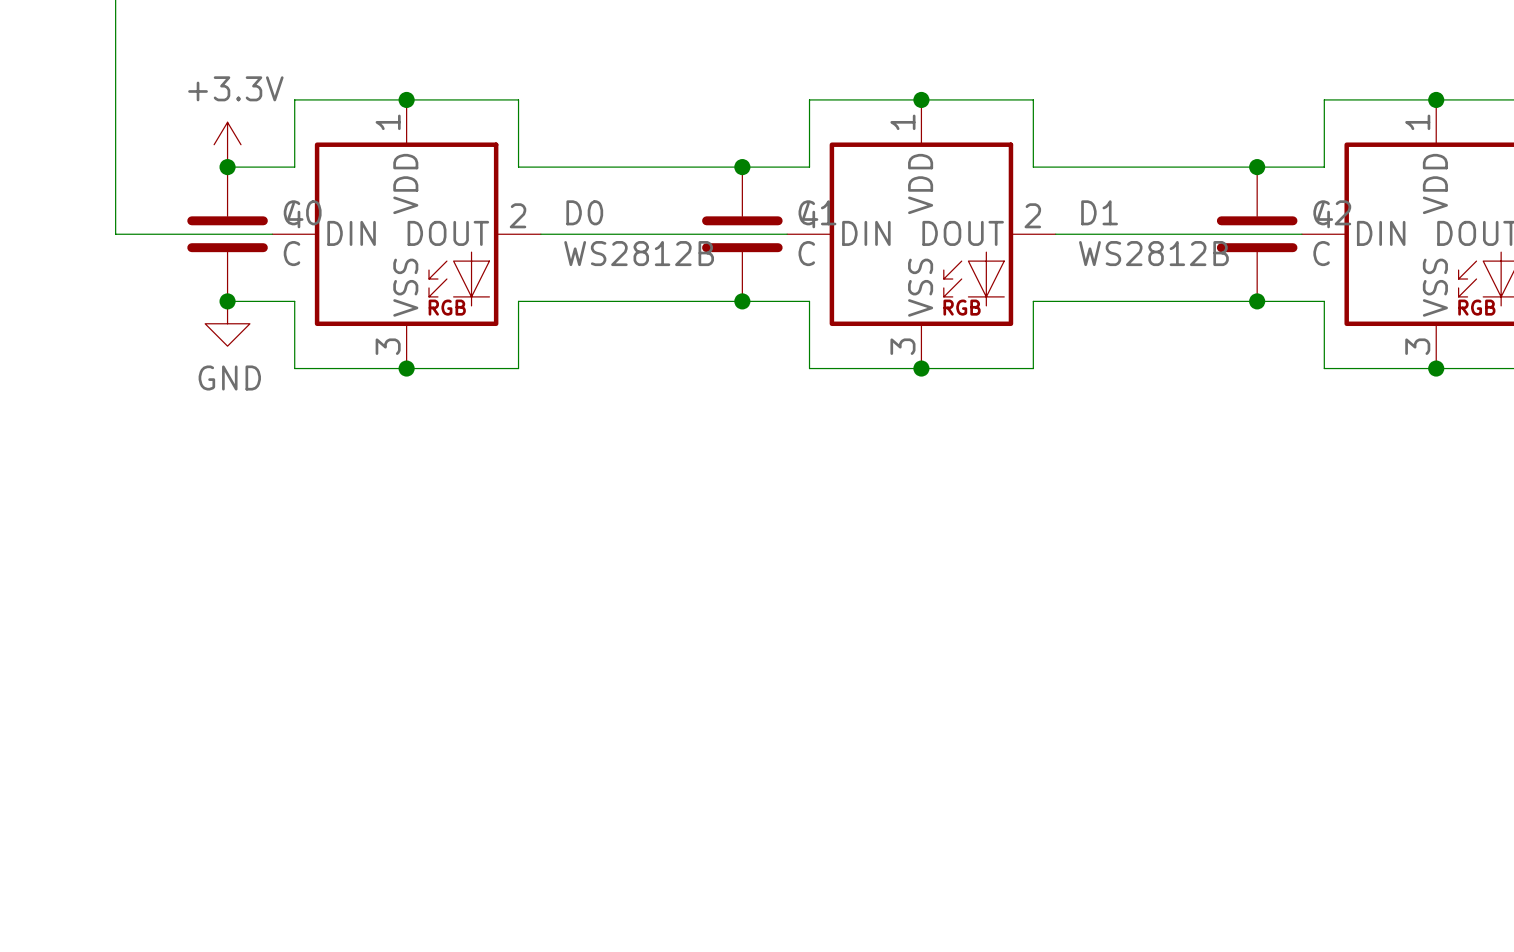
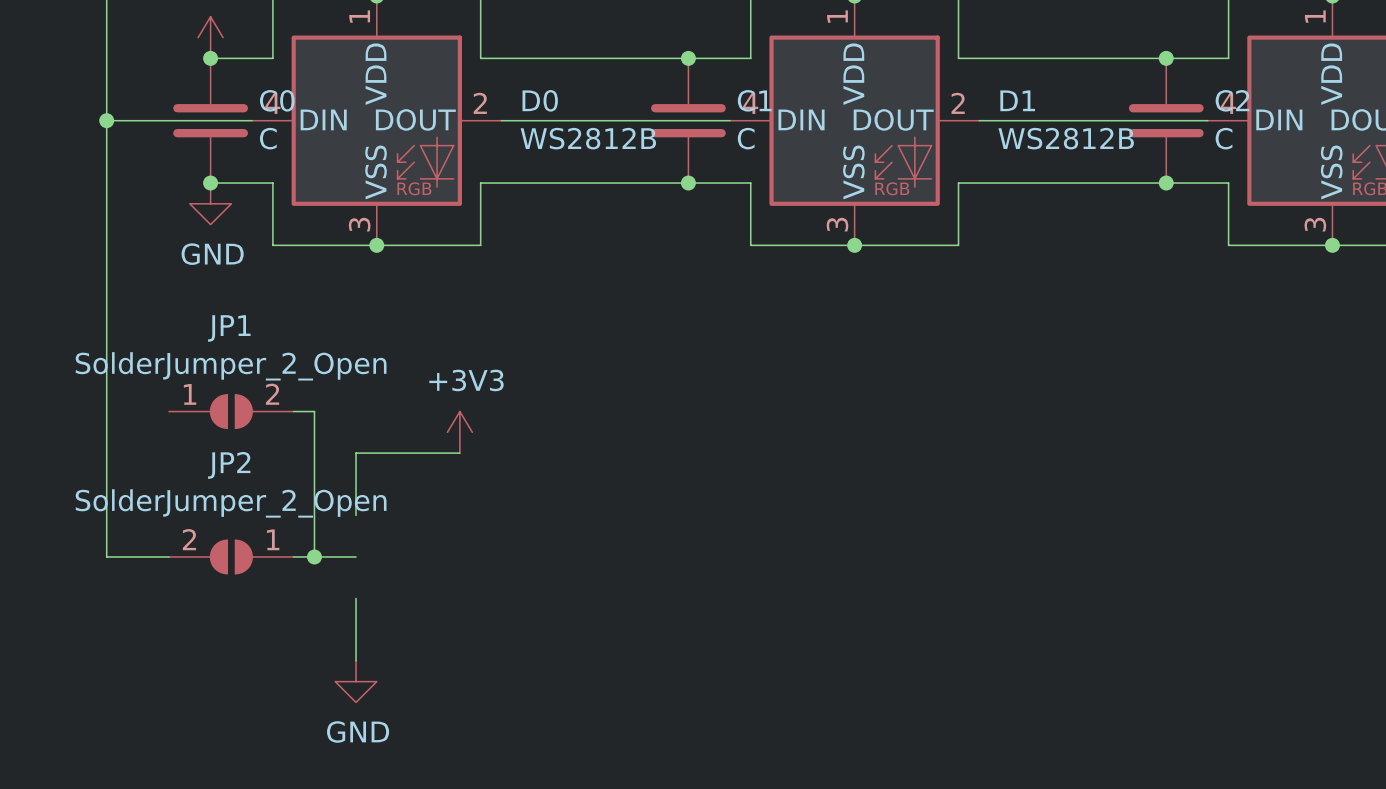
wire: none -> (106, 120) (106, 556) (169, 556)
junction: none -> (106, 120)
JP1: none -> SolderJumper_2_Open (231, 411)
wire: none -> (293, 411) (314, 411) (314, 556)
power symbol: none -> +3V3 (459, 432)
wire: none -> (459, 453) (356, 453) (356, 515)
JP2: none -> SolderJumper_2_Open (231, 556)
wire: none -> (293, 556) (356, 556)
junction: none -> (314, 556)
wire: none -> (356, 598) (356, 660)
power symbol: none -> GND (356, 681)

